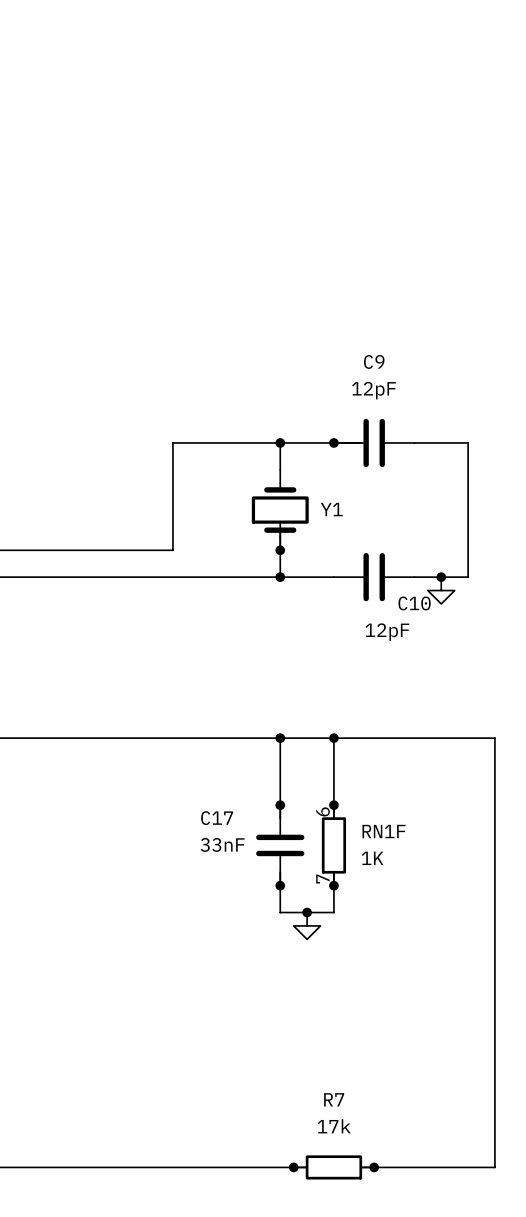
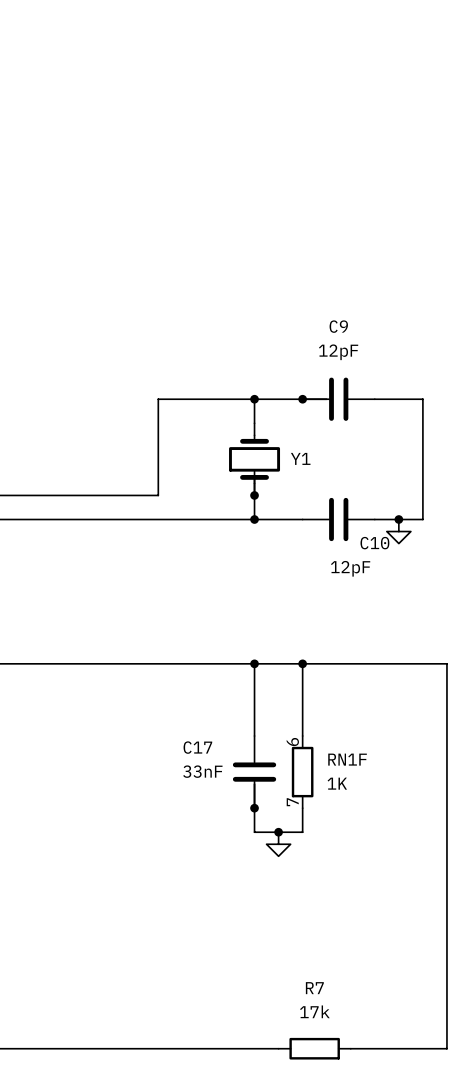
junction: (280, 805) -> none
junction: (333, 805) -> none
C17 position: (280, 845) -> (254, 772)
RN1F position: (333, 845) -> (302, 772)
junction position: (280, 885) -> (254, 808)
junction: (333, 885) -> none
wire: (280, 912) (333, 912) -> (254, 820) (254, 832) (302, 832) (302, 820)
junction position: (307, 912) -> (278, 832)
power symbol position: (307, 925) -> (278, 844)
junction: (293, 1167) -> none
R7 position: (333, 1167) -> (314, 1048)
junction: (374, 1167) -> none

